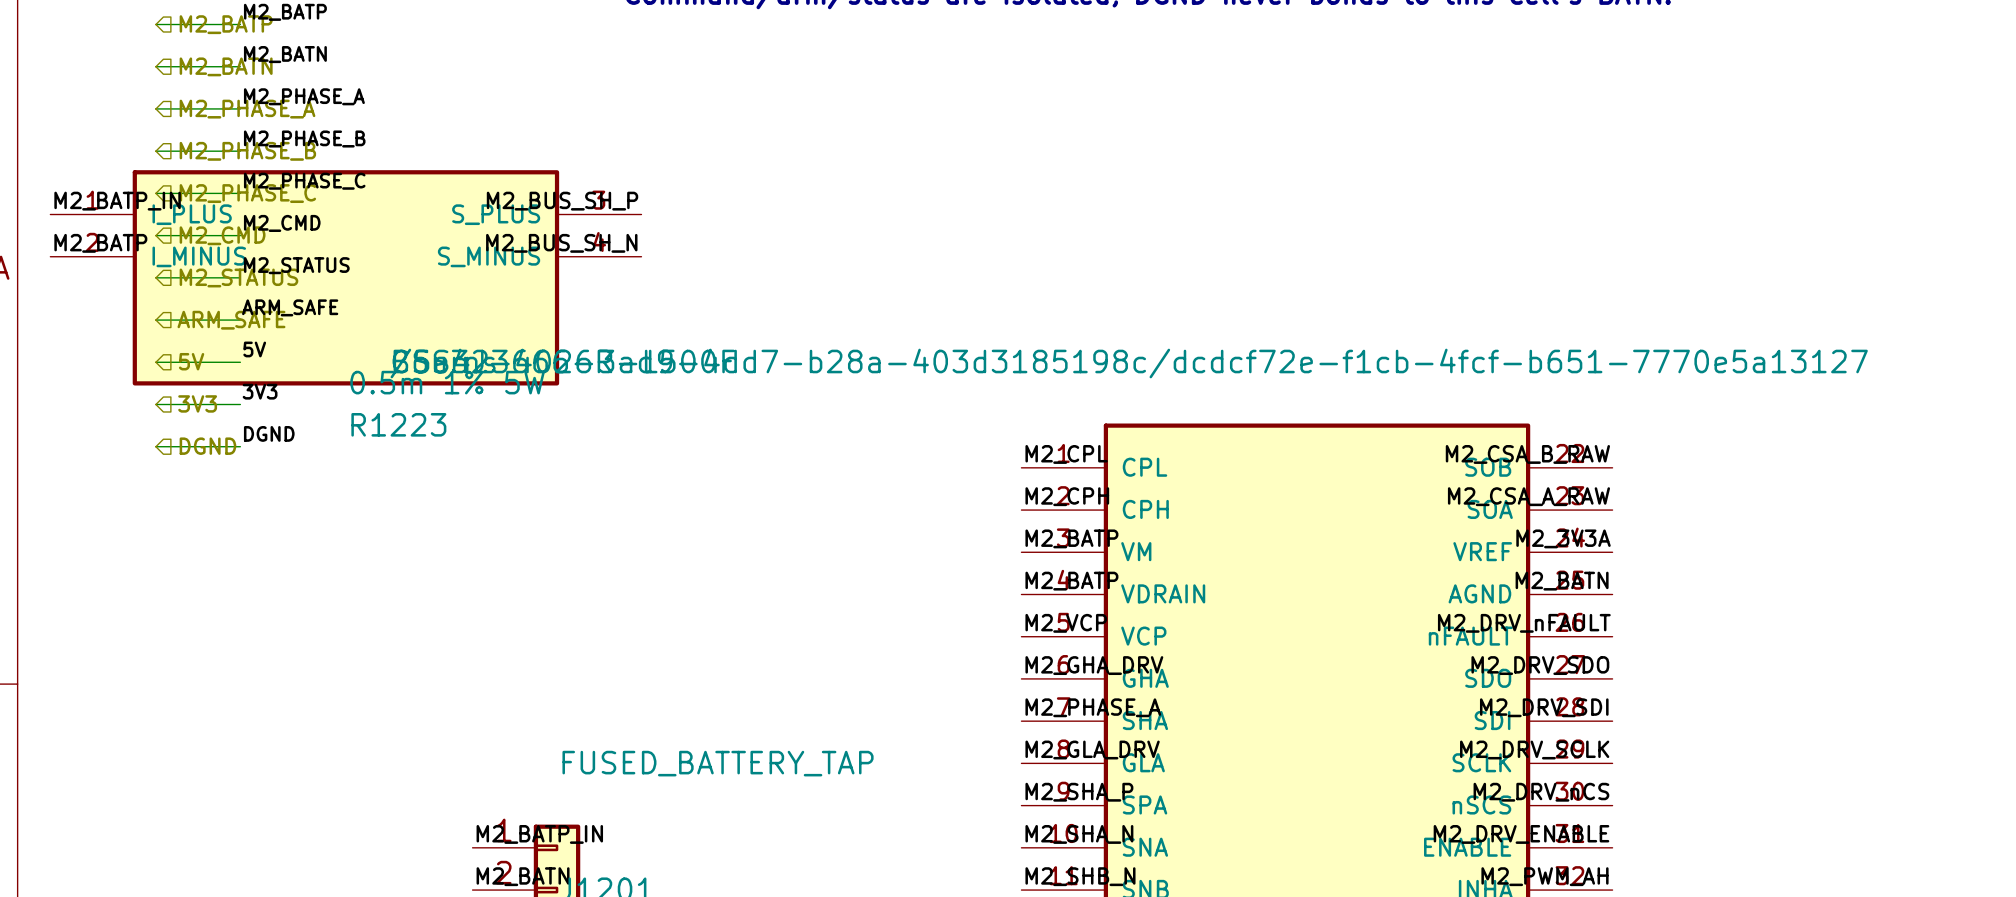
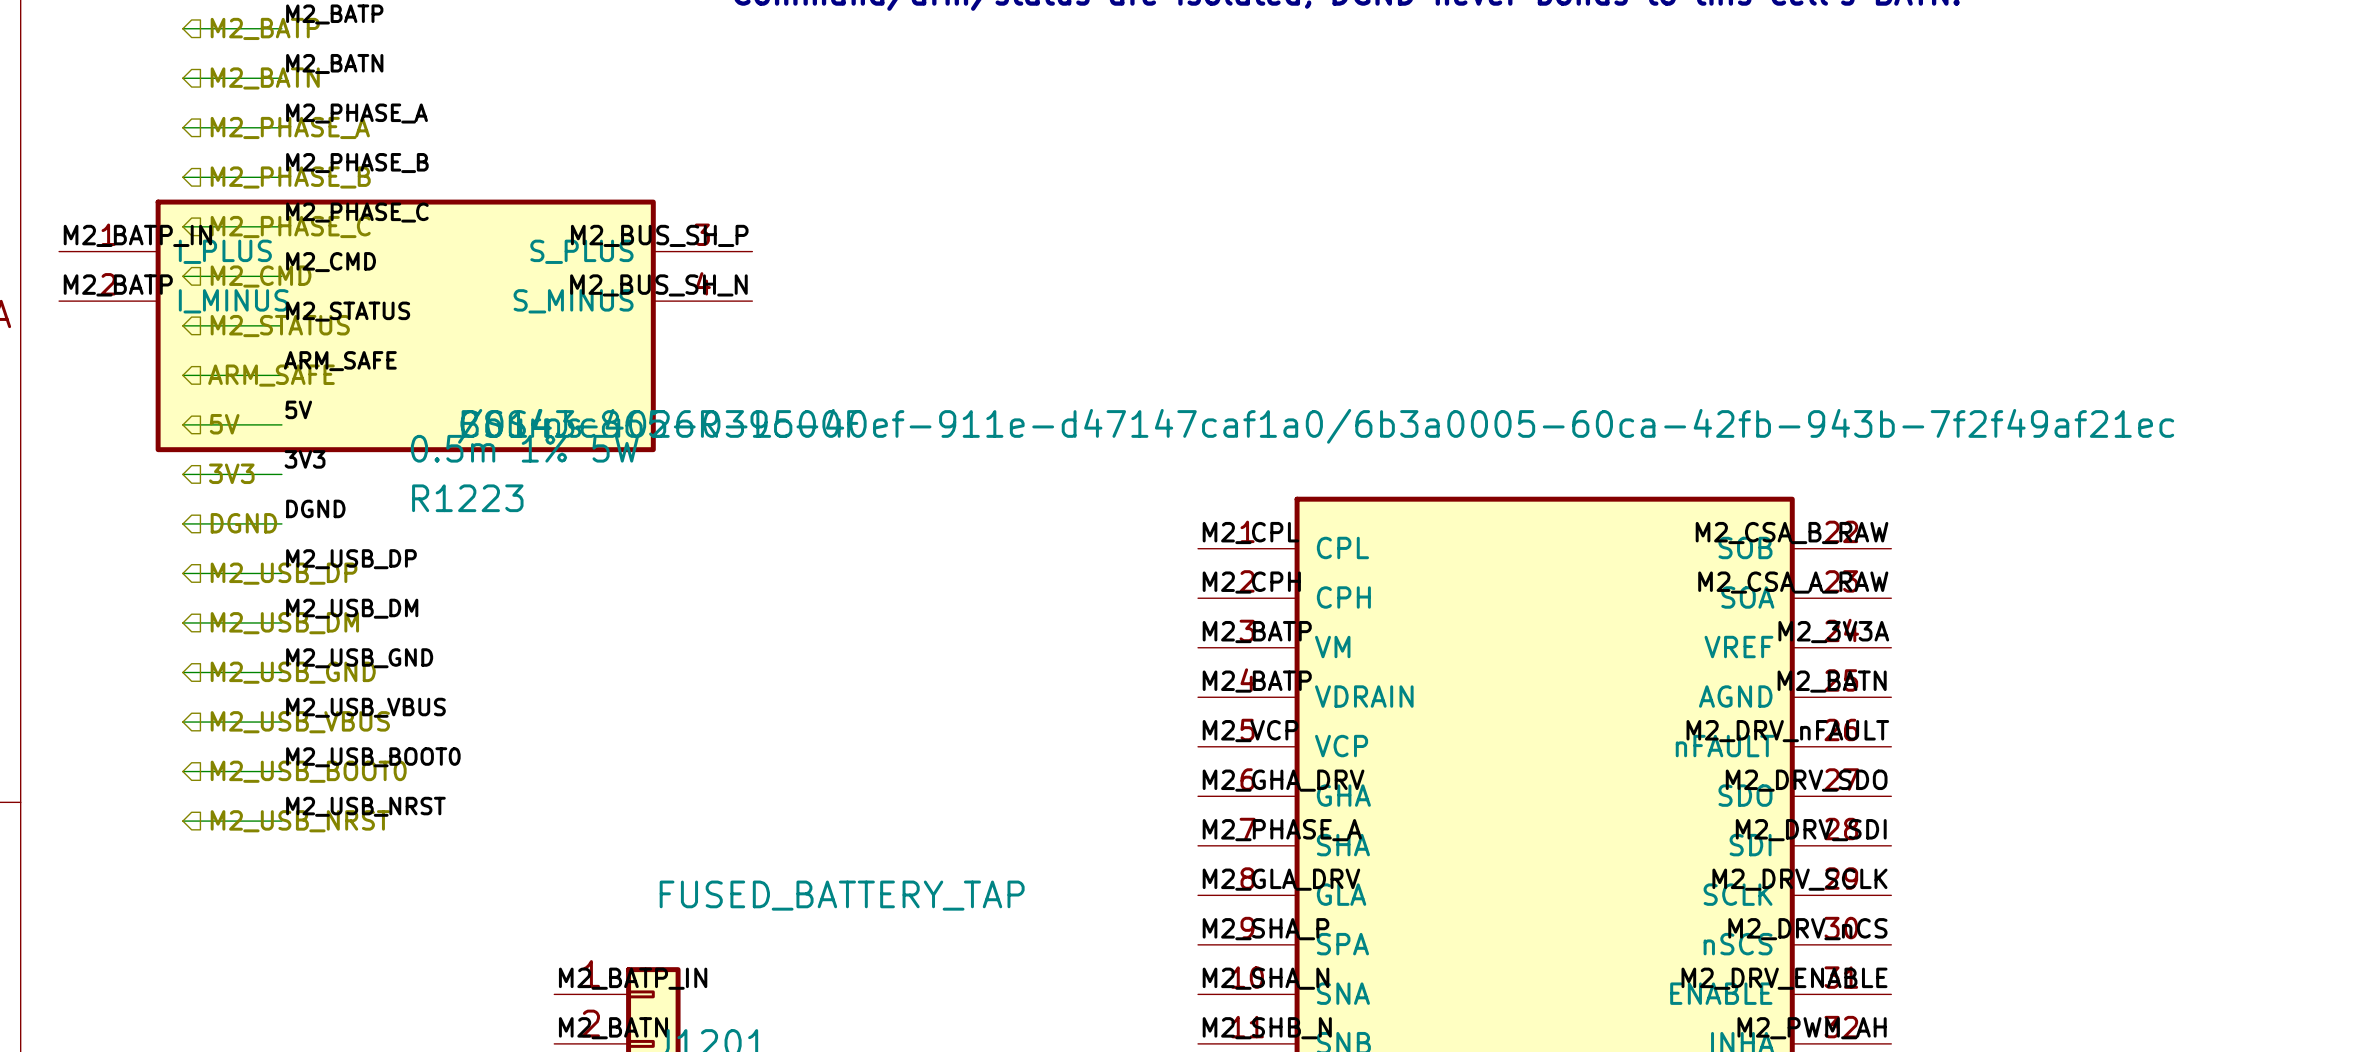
R1223 text: /5e323666-3ad9-4dd7-b28a-403d3185198c/dcdcf72e-f1cb-4fcf-b651-7770e5a13127 (1129, 363) -> /0143c865-039c-40ef-911e-d47147caf1a0/6b3a0005-60ca-42fb-943b-7f2f49af21ec (1316, 426)
label: none -> M2_USB_DP (351, 559)
wire: none -> (182, 573) (281, 573)
hierarchical label: none -> M2_USB_DP (284, 573)
label: none -> M2_USB_DM (352, 608)
wire: none -> (182, 622) (281, 622)
hierarchical label: none -> M2_USB_DM (284, 623)
label: none -> M2_USB_GND (359, 658)
wire: none -> (182, 672) (281, 672)
hierarchical label: none -> M2_USB_GND (293, 672)
label: none -> M2_USB_VBUS (365, 707)
wire: none -> (182, 722) (281, 722)
hierarchical label: none -> M2_USB_VBUS (300, 722)
label: none -> M2_USB_BOOT0 (373, 757)
wire: none -> (182, 771) (281, 771)
hierarchical label: none -> M2_USB_BOOT0 (308, 771)
label: none -> M2_USB_NRST (365, 806)
wire: none -> (182, 821) (281, 821)
hierarchical label: none -> M2_USB_NRST (300, 821)

